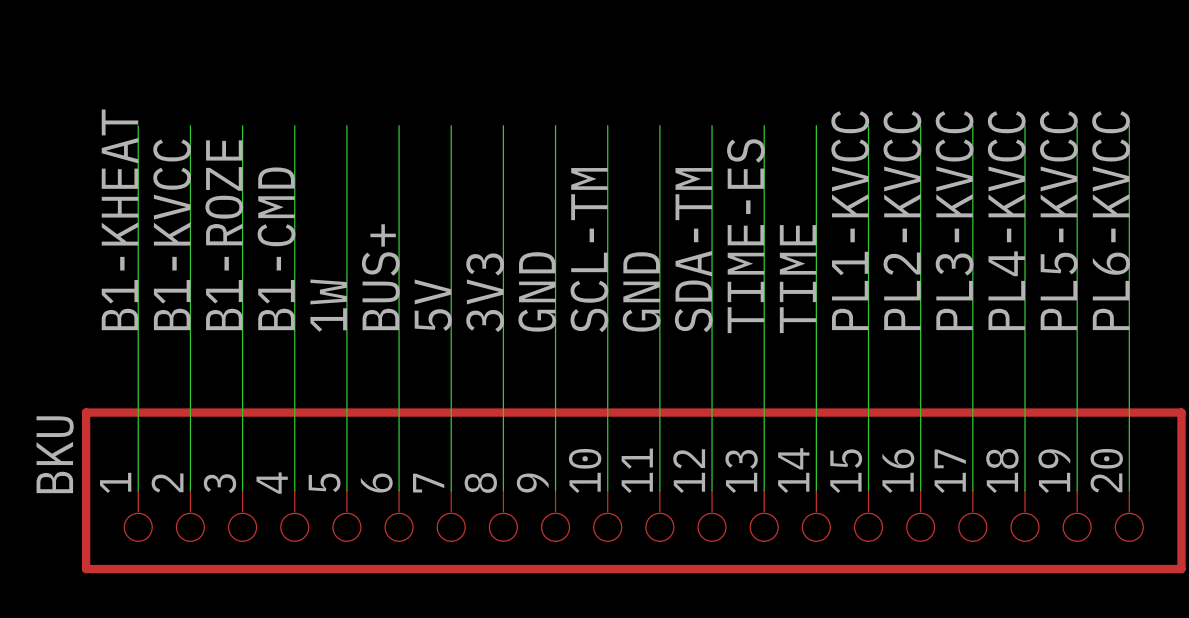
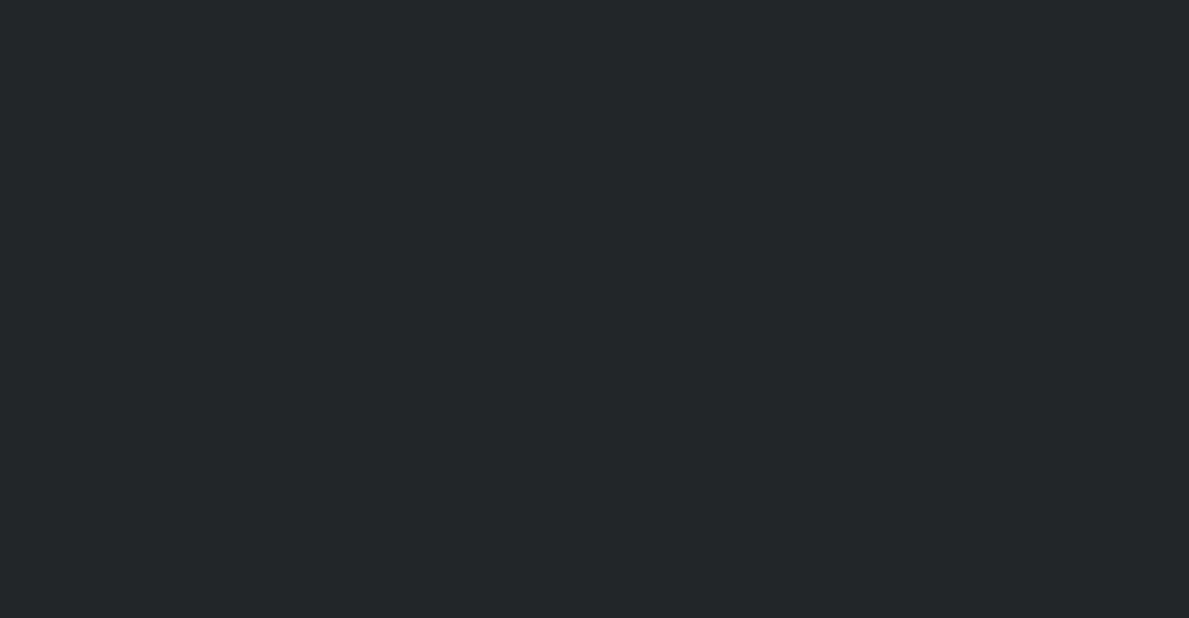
wire: (138, 125) (138, 490) -> none
wire: (190, 125) (190, 490) -> none
wire: (242, 125) (242, 490) -> none
wire: (294, 125) (294, 490) -> none
wire: (346, 125) (346, 490) -> none
wire: (399, 125) (399, 490) -> none
wire: (451, 125) (451, 490) -> none
wire: (503, 125) (503, 490) -> none
wire: (555, 125) (555, 490) -> none
wire: (607, 125) (607, 490) -> none
wire: (659, 125) (659, 490) -> none
wire: (712, 125) (712, 490) -> none
wire: (764, 125) (764, 490) -> none
wire: (816, 125) (816, 490) -> none
wire: (868, 125) (868, 490) -> none
wire: (920, 125) (920, 490) -> none
wire: (972, 125) (972, 490) -> none
wire: (1025, 125) (1025, 490) -> none
wire: (1077, 125) (1077, 490) -> none
wire: (1129, 125) (1129, 490) -> none
label: B1-KHEAT (120, 219) -> none
label: PL1-KVCC (850, 220) -> none
label: PL2-KVCC (902, 220) -> none
label: PL3-KVCC (954, 220) -> none
label: PL4-KVCC (1006, 220) -> none
label: PL5-KVCC (1058, 220) -> none
label: PL6-KVCC (1111, 220) -> none
label: B1-KVCC (172, 234) -> none
label: B1-ROZE (224, 235) -> none
label: TIME-ES (745, 236) -> none
label: B1-CMD (276, 248) -> none
label: SCL-TM (589, 250) -> none
label: SDA-TM (693, 250) -> none
label: BUS+ (380, 277) -> none
label: TIME (798, 279) -> none
label: GND (537, 291) -> none
label: GND (641, 291) -> none
label: 3V3 (485, 292) -> none
label: 1W (328, 305) -> none
label: 5V (433, 305) -> none
BKU: (633, 490) -> none

